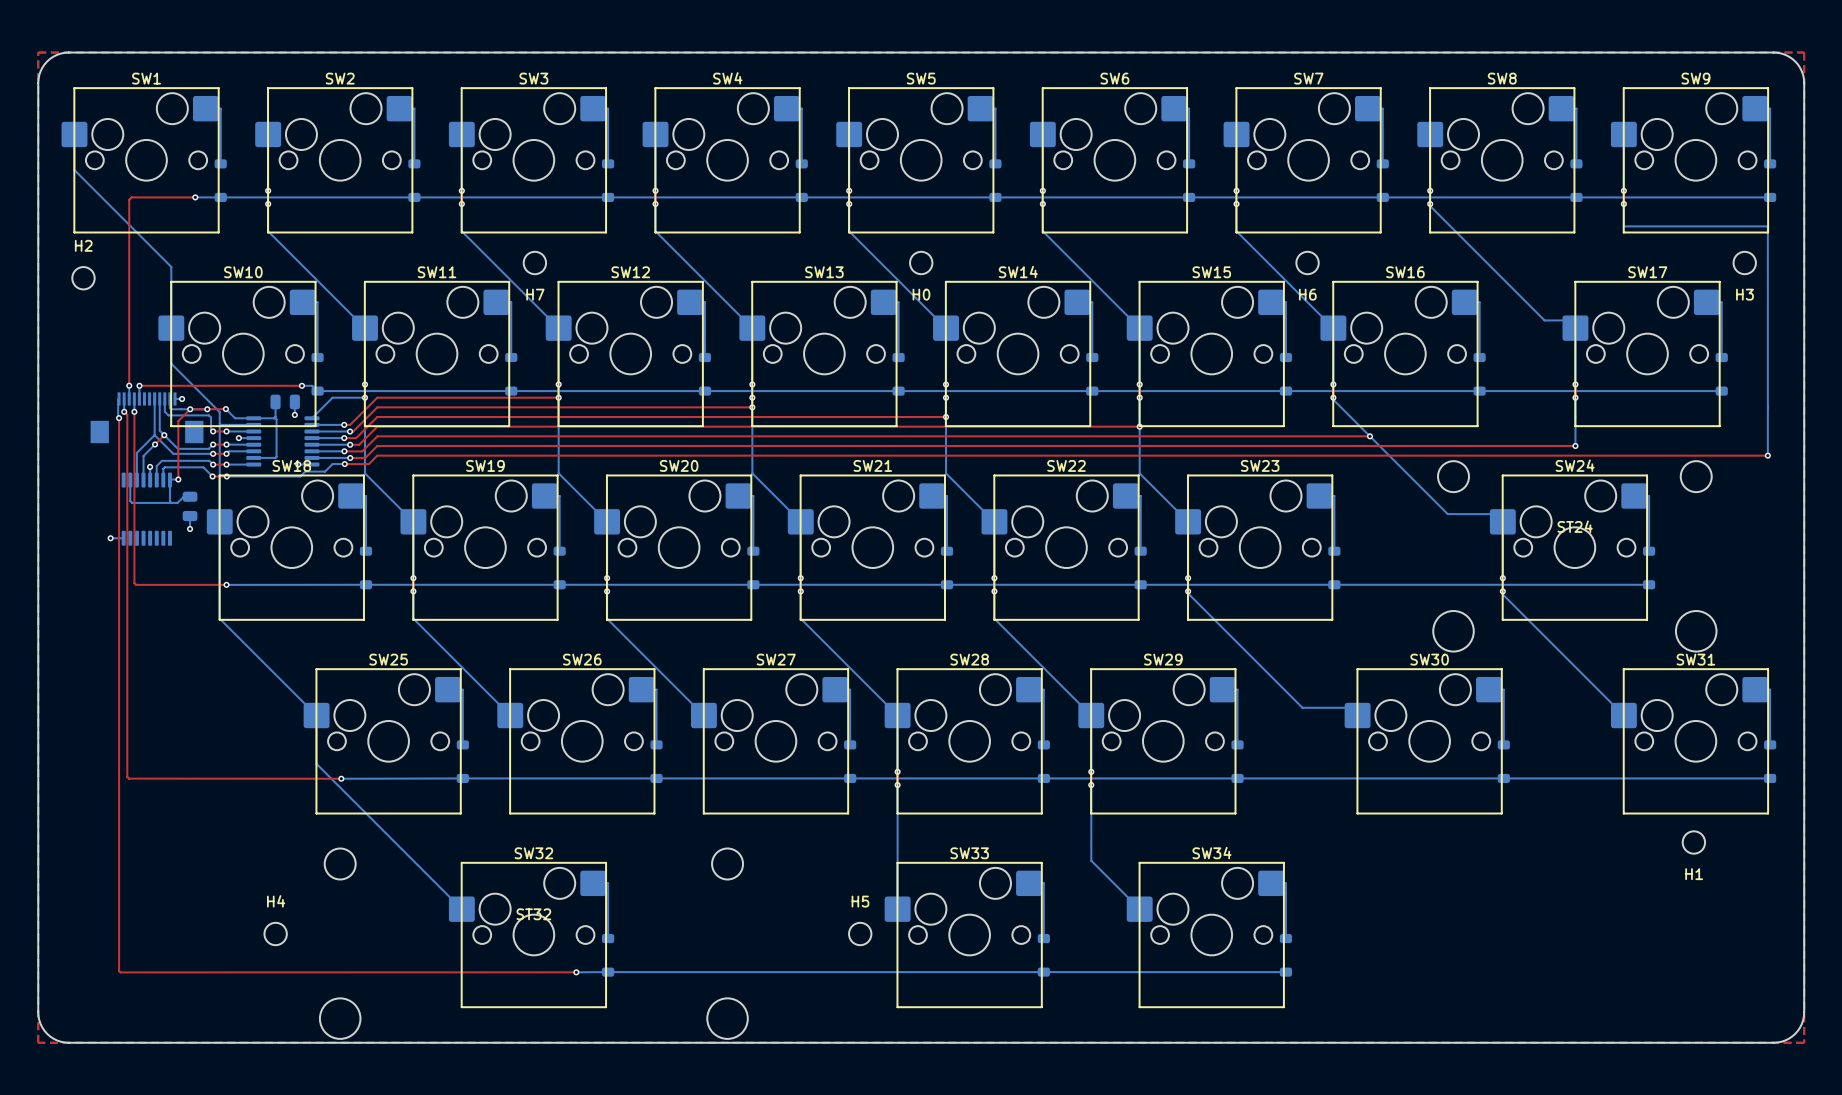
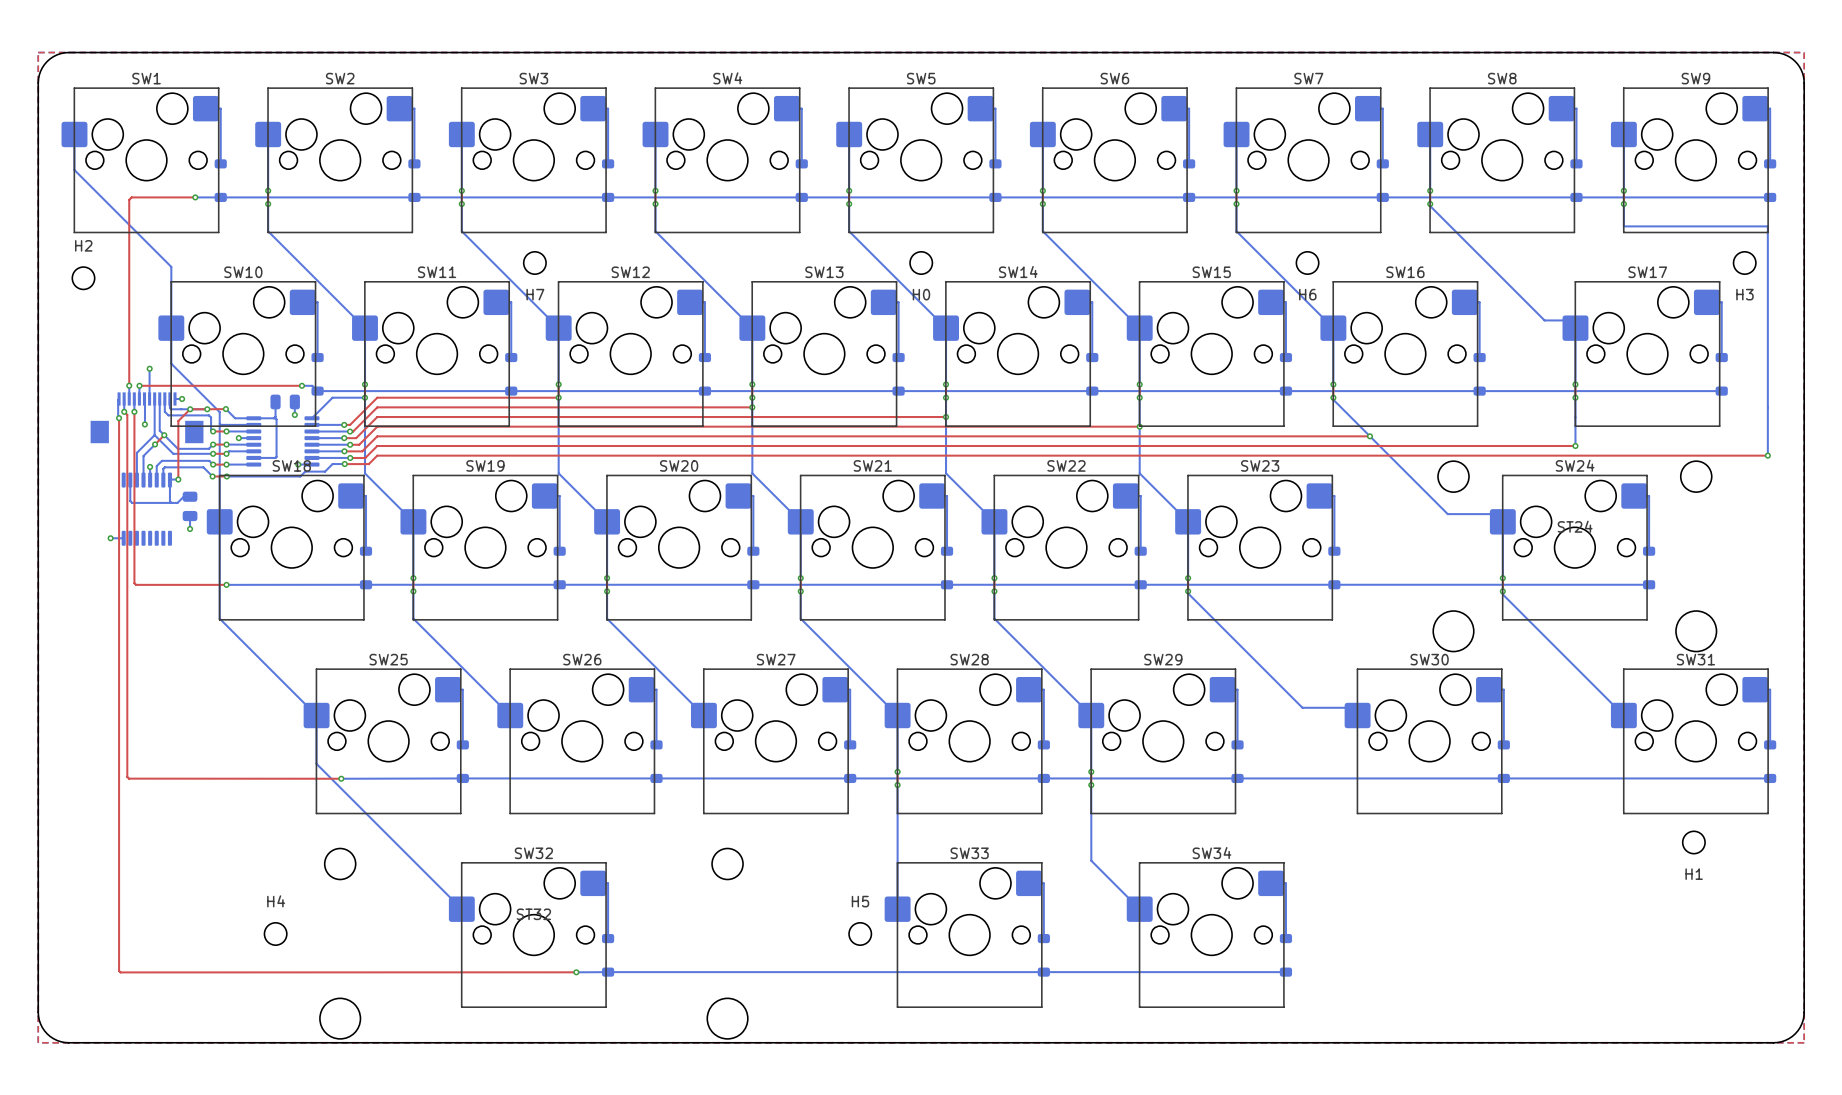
bottom track: none -> (149, 368) (149, 398)
via: none -> (149, 368)
bottom track: none -> (144, 398) (144, 424)
via: none -> (144, 424)

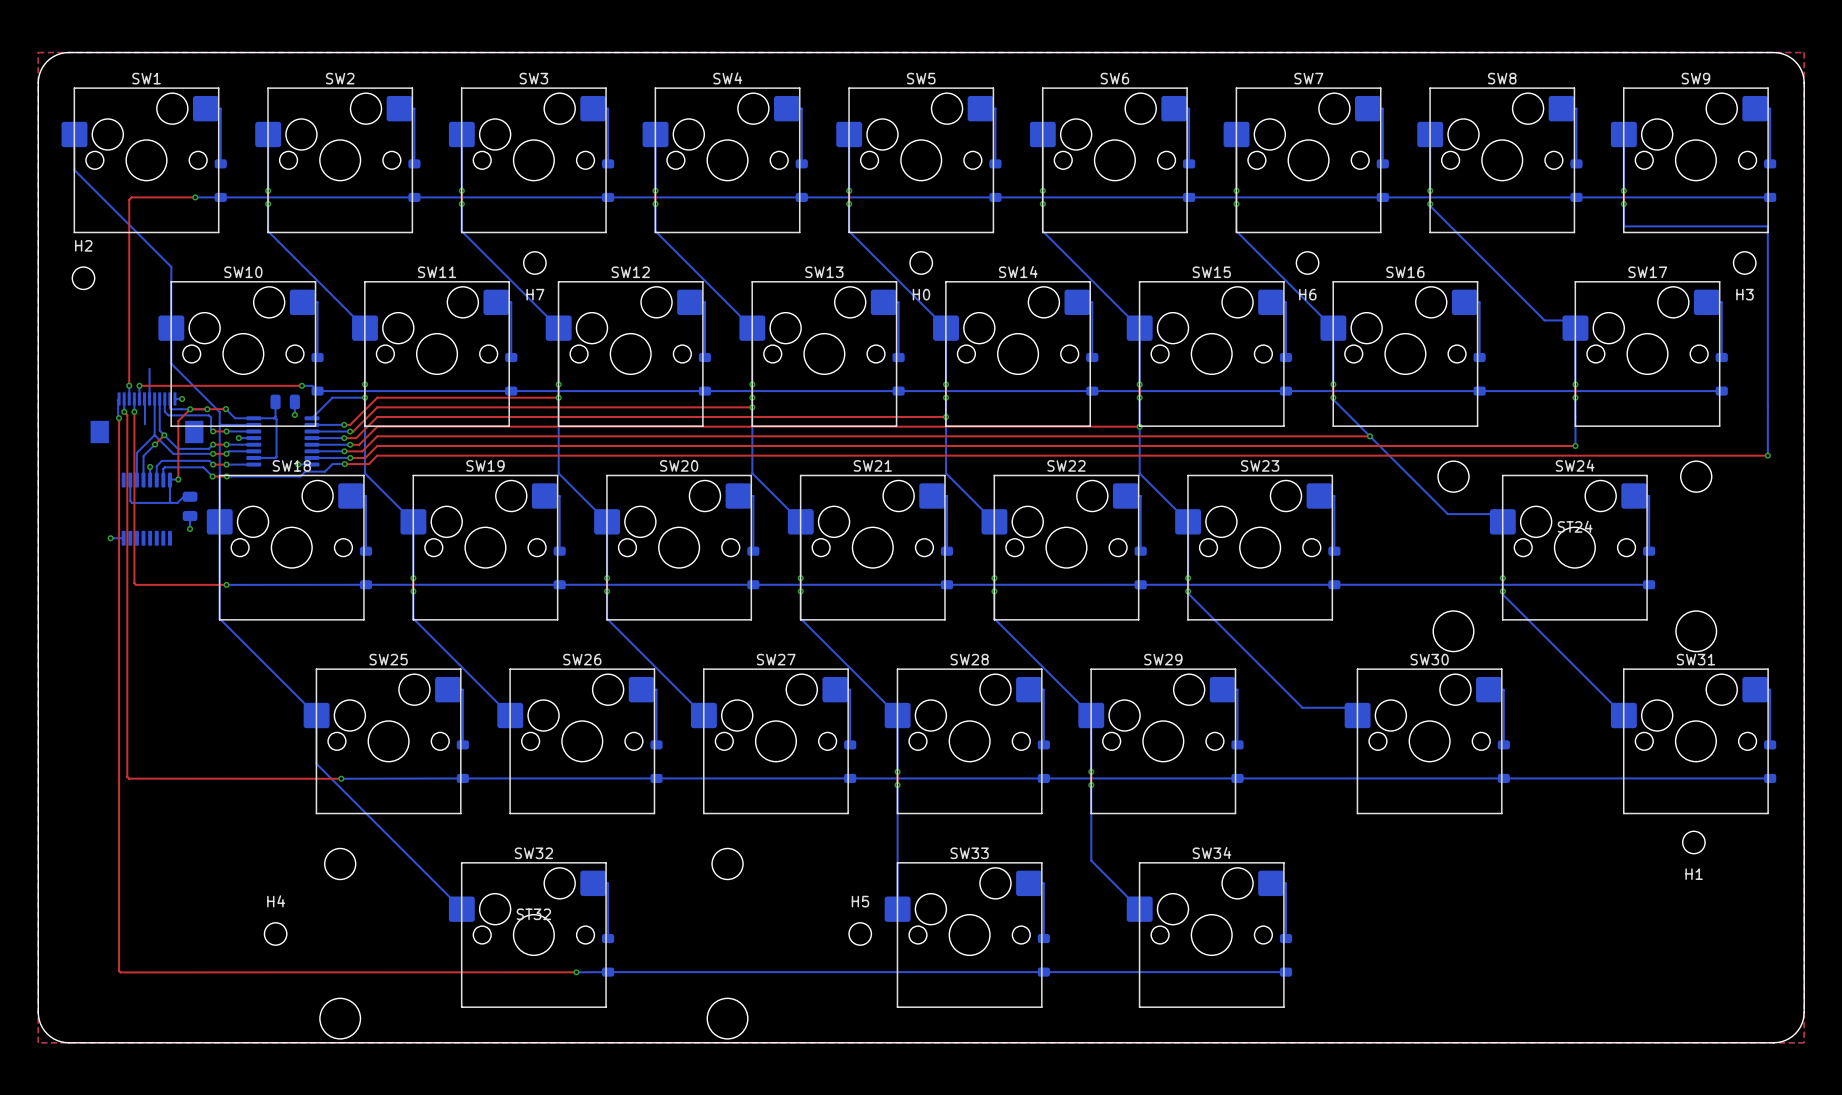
via: (149, 368) -> none
via: (144, 424) -> none

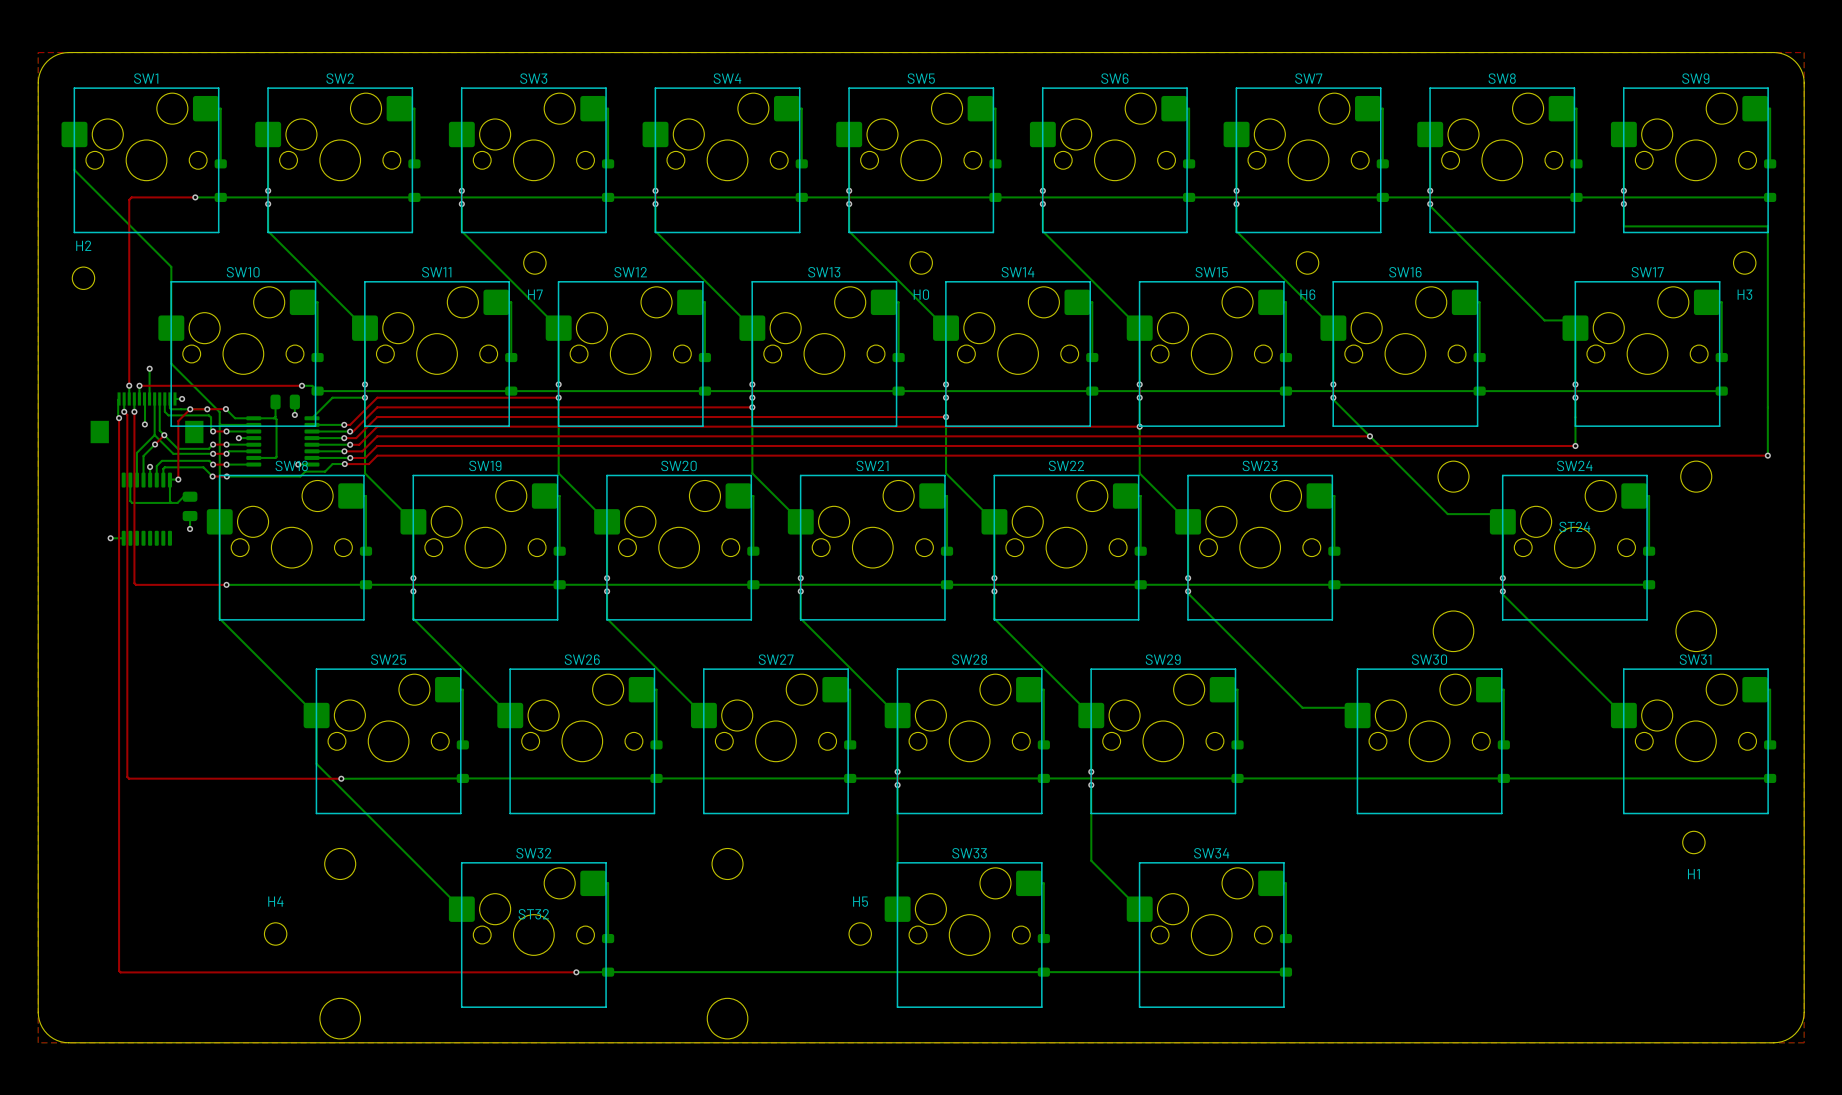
via: none -> (149, 368)
via: none -> (144, 424)

